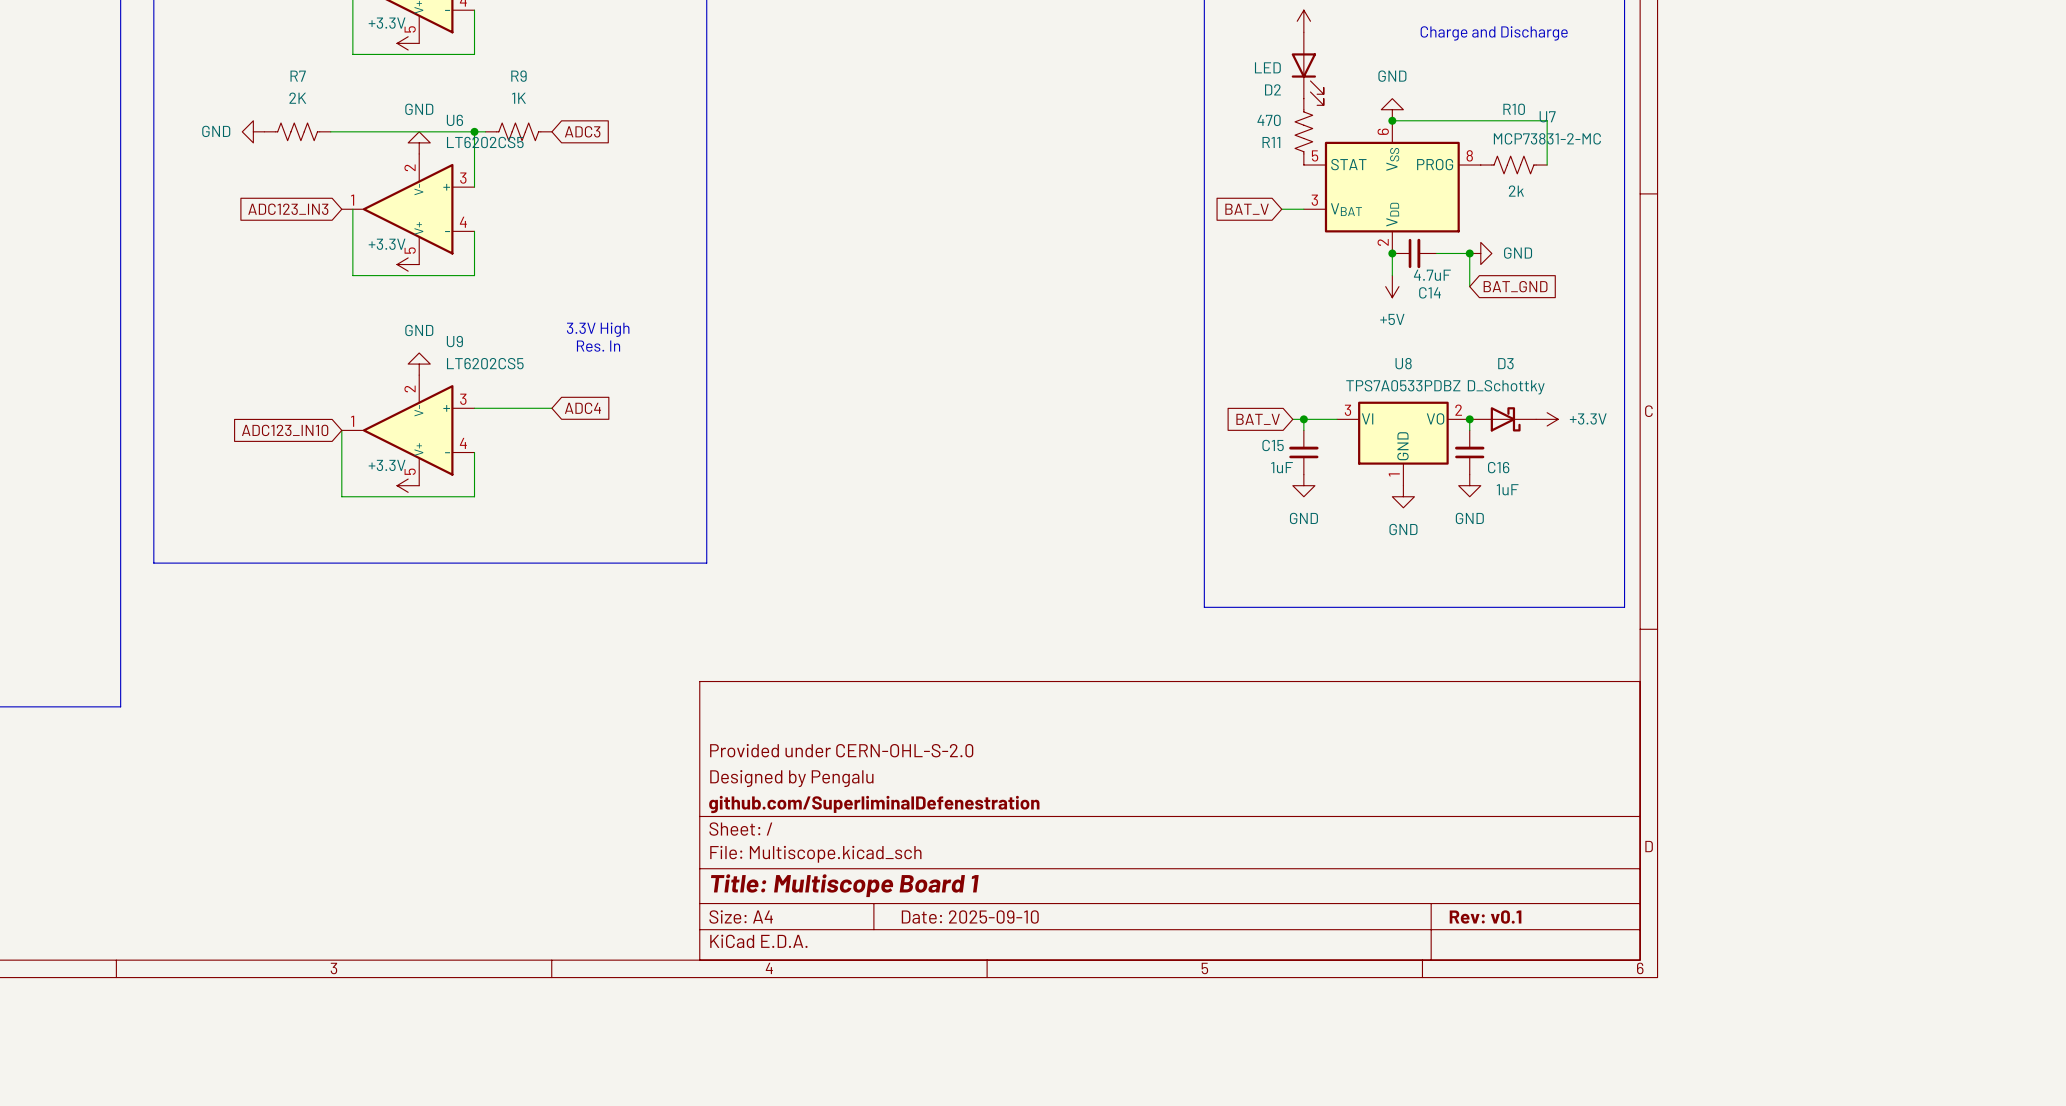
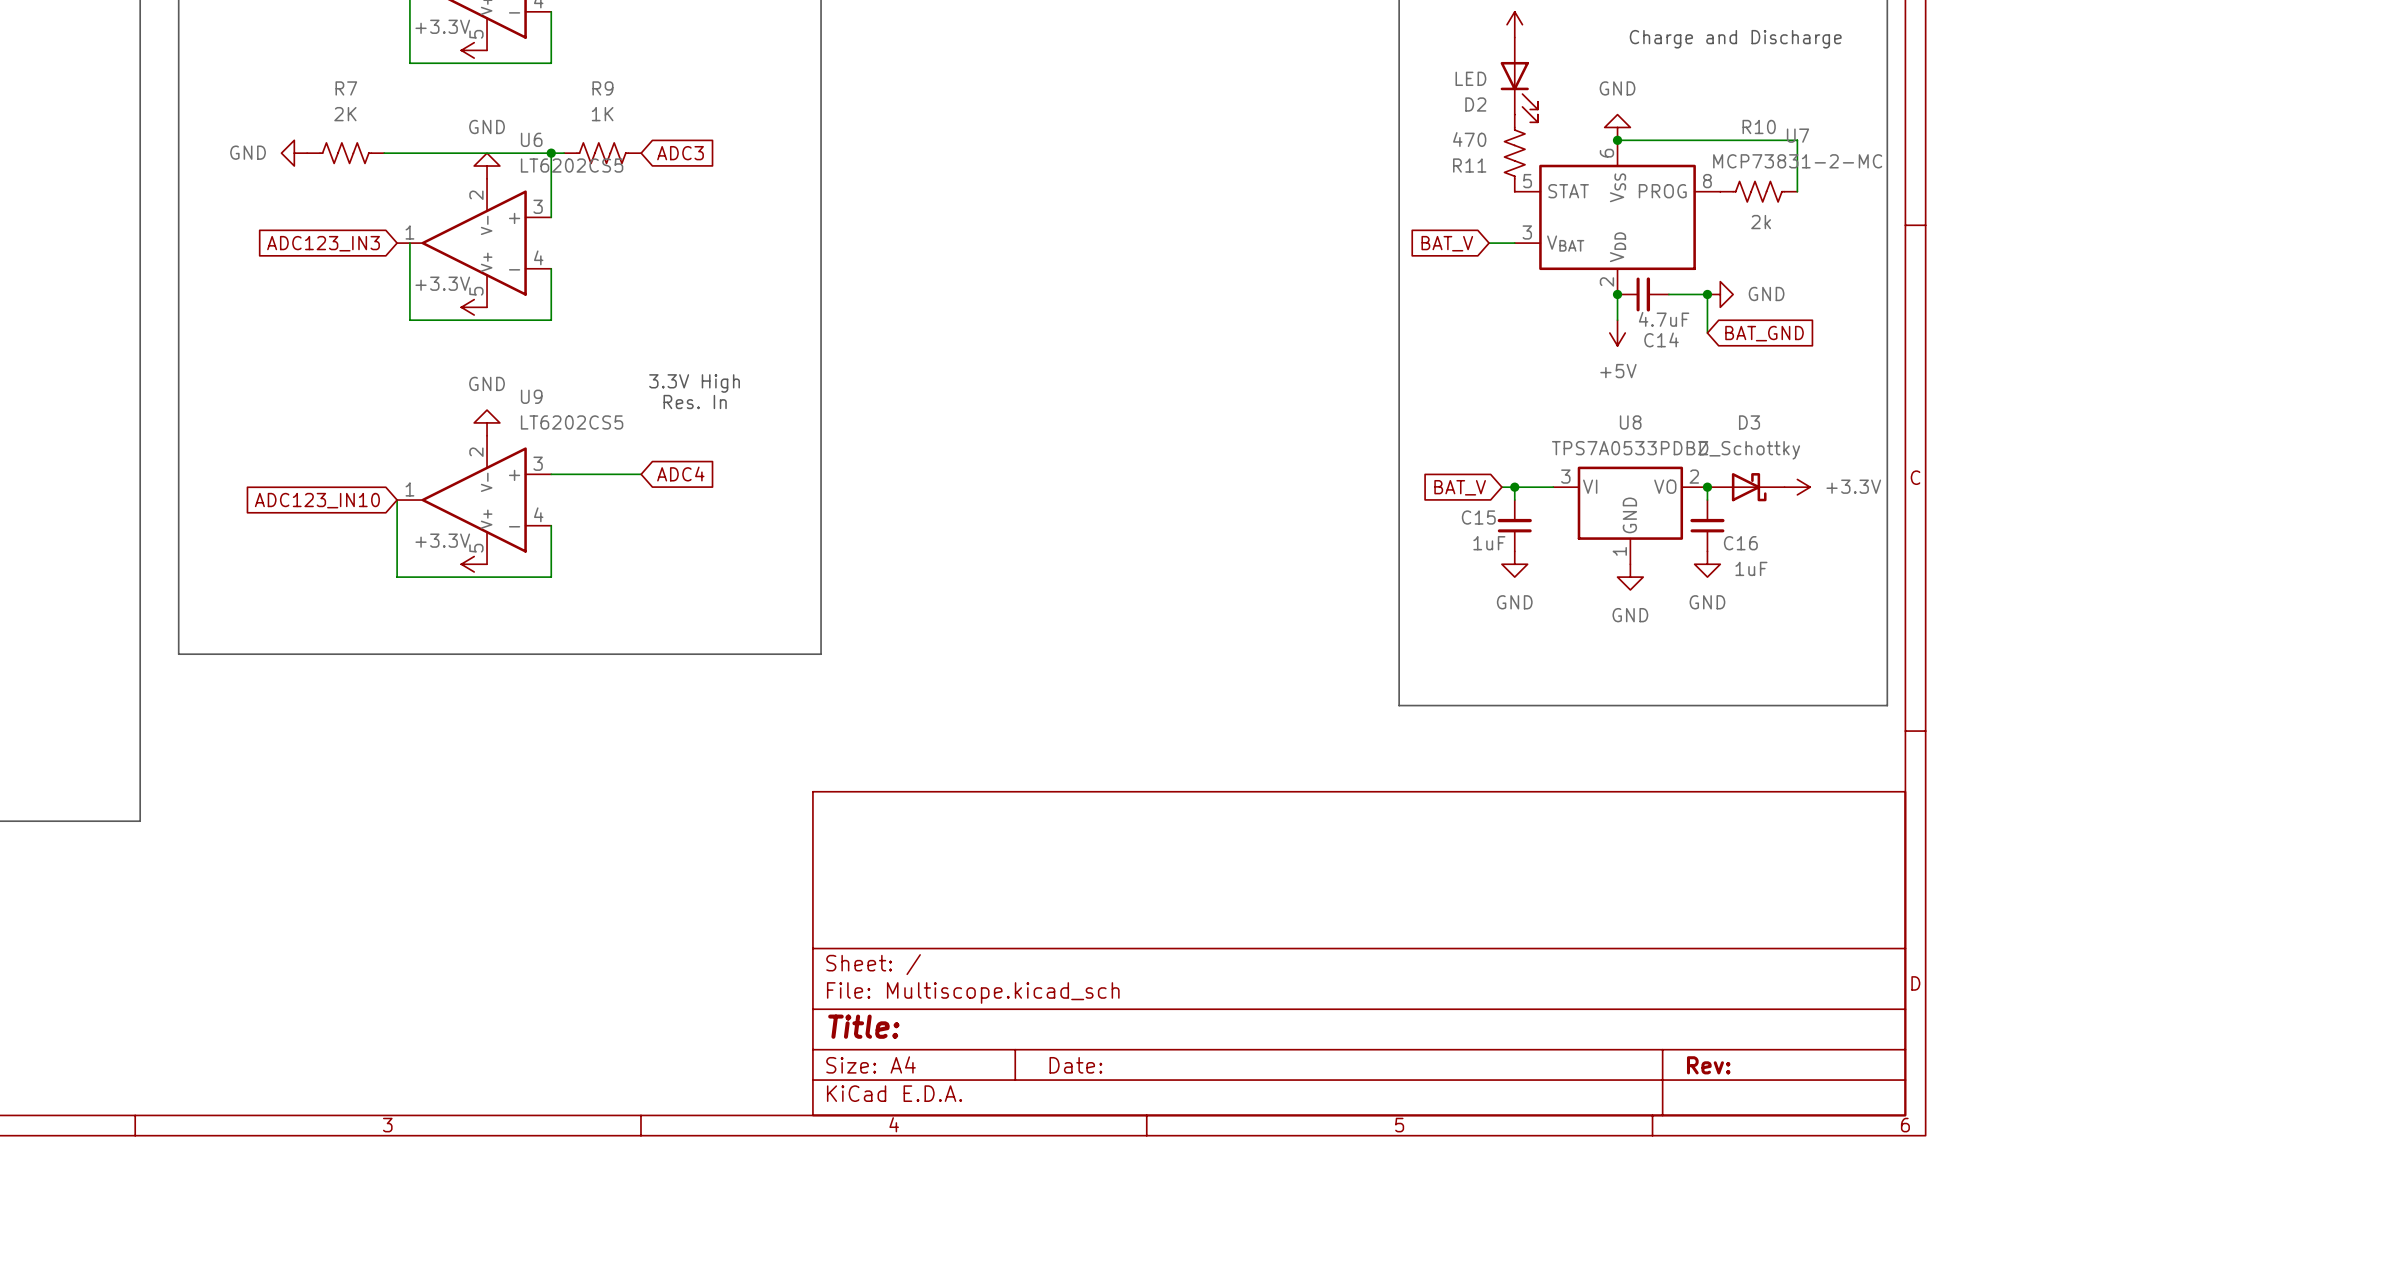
title block: Provided under CERN-OHL-S-2.0 (841, 750) -> none
title block: Designed by Pengalu (791, 778) -> none
title block: github.com/SuperliminalDefenestration (874, 804) -> none
title block: Title: Multiscope Board 1 (844, 885) -> Title: (863, 1026)
title block: Date: 2025-09-10 (970, 917) -> Date: (1075, 1065)
title block: Rev: v0.1 (1485, 917) -> Rev: (1708, 1065)

